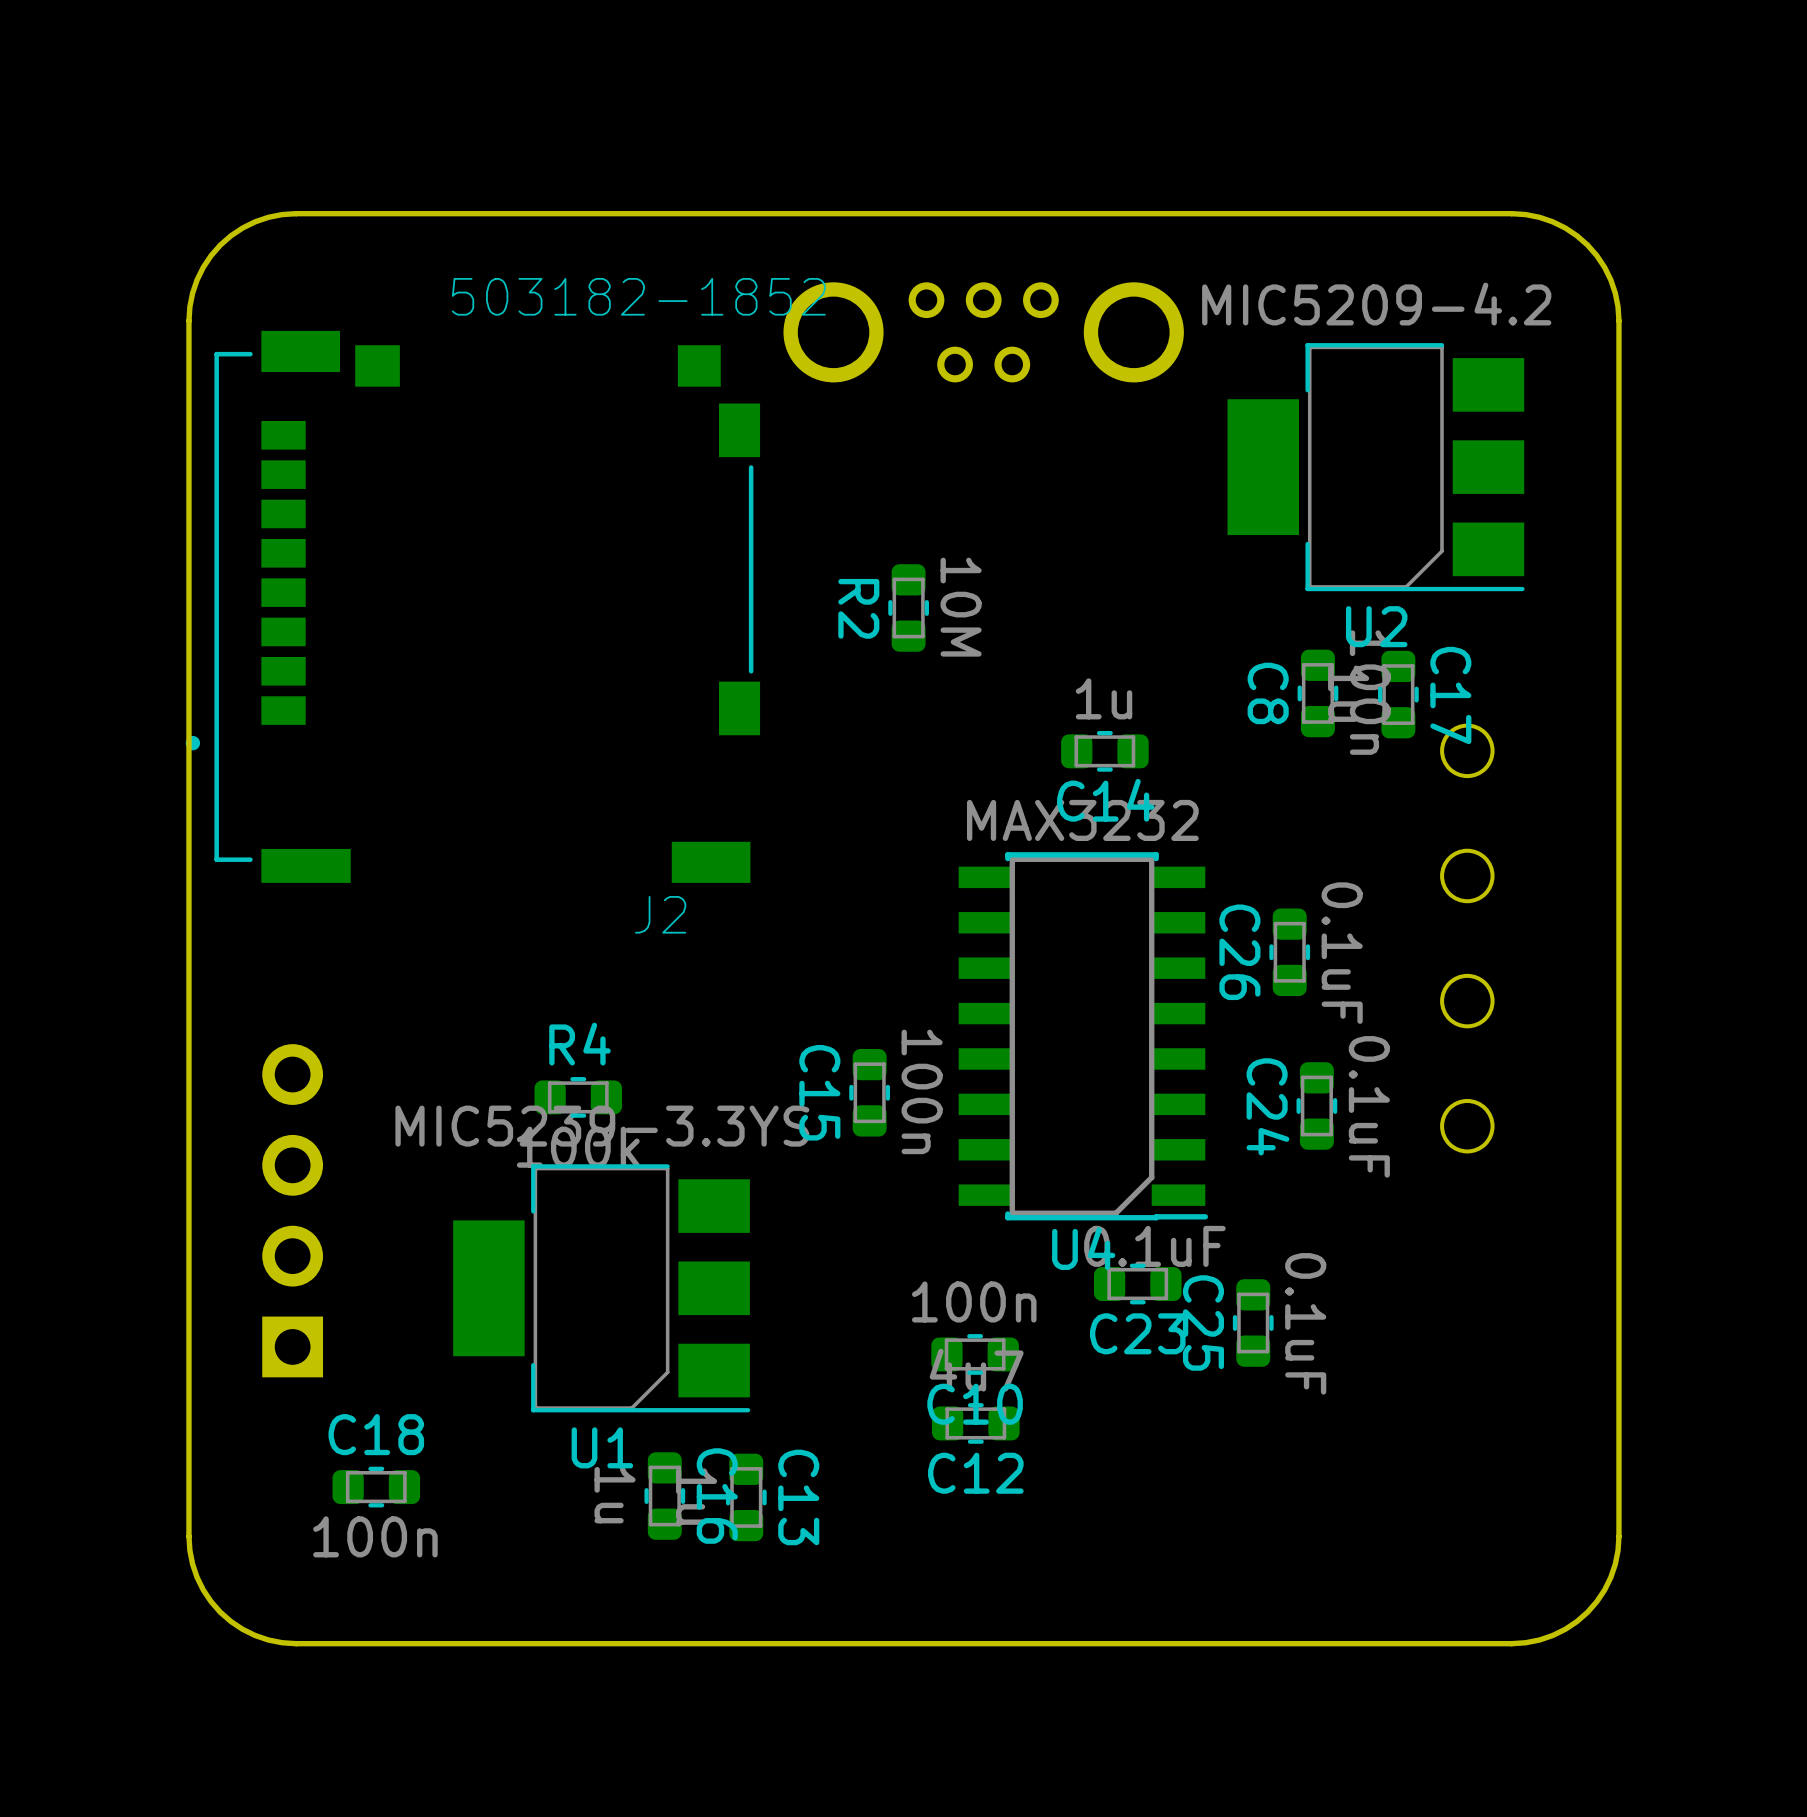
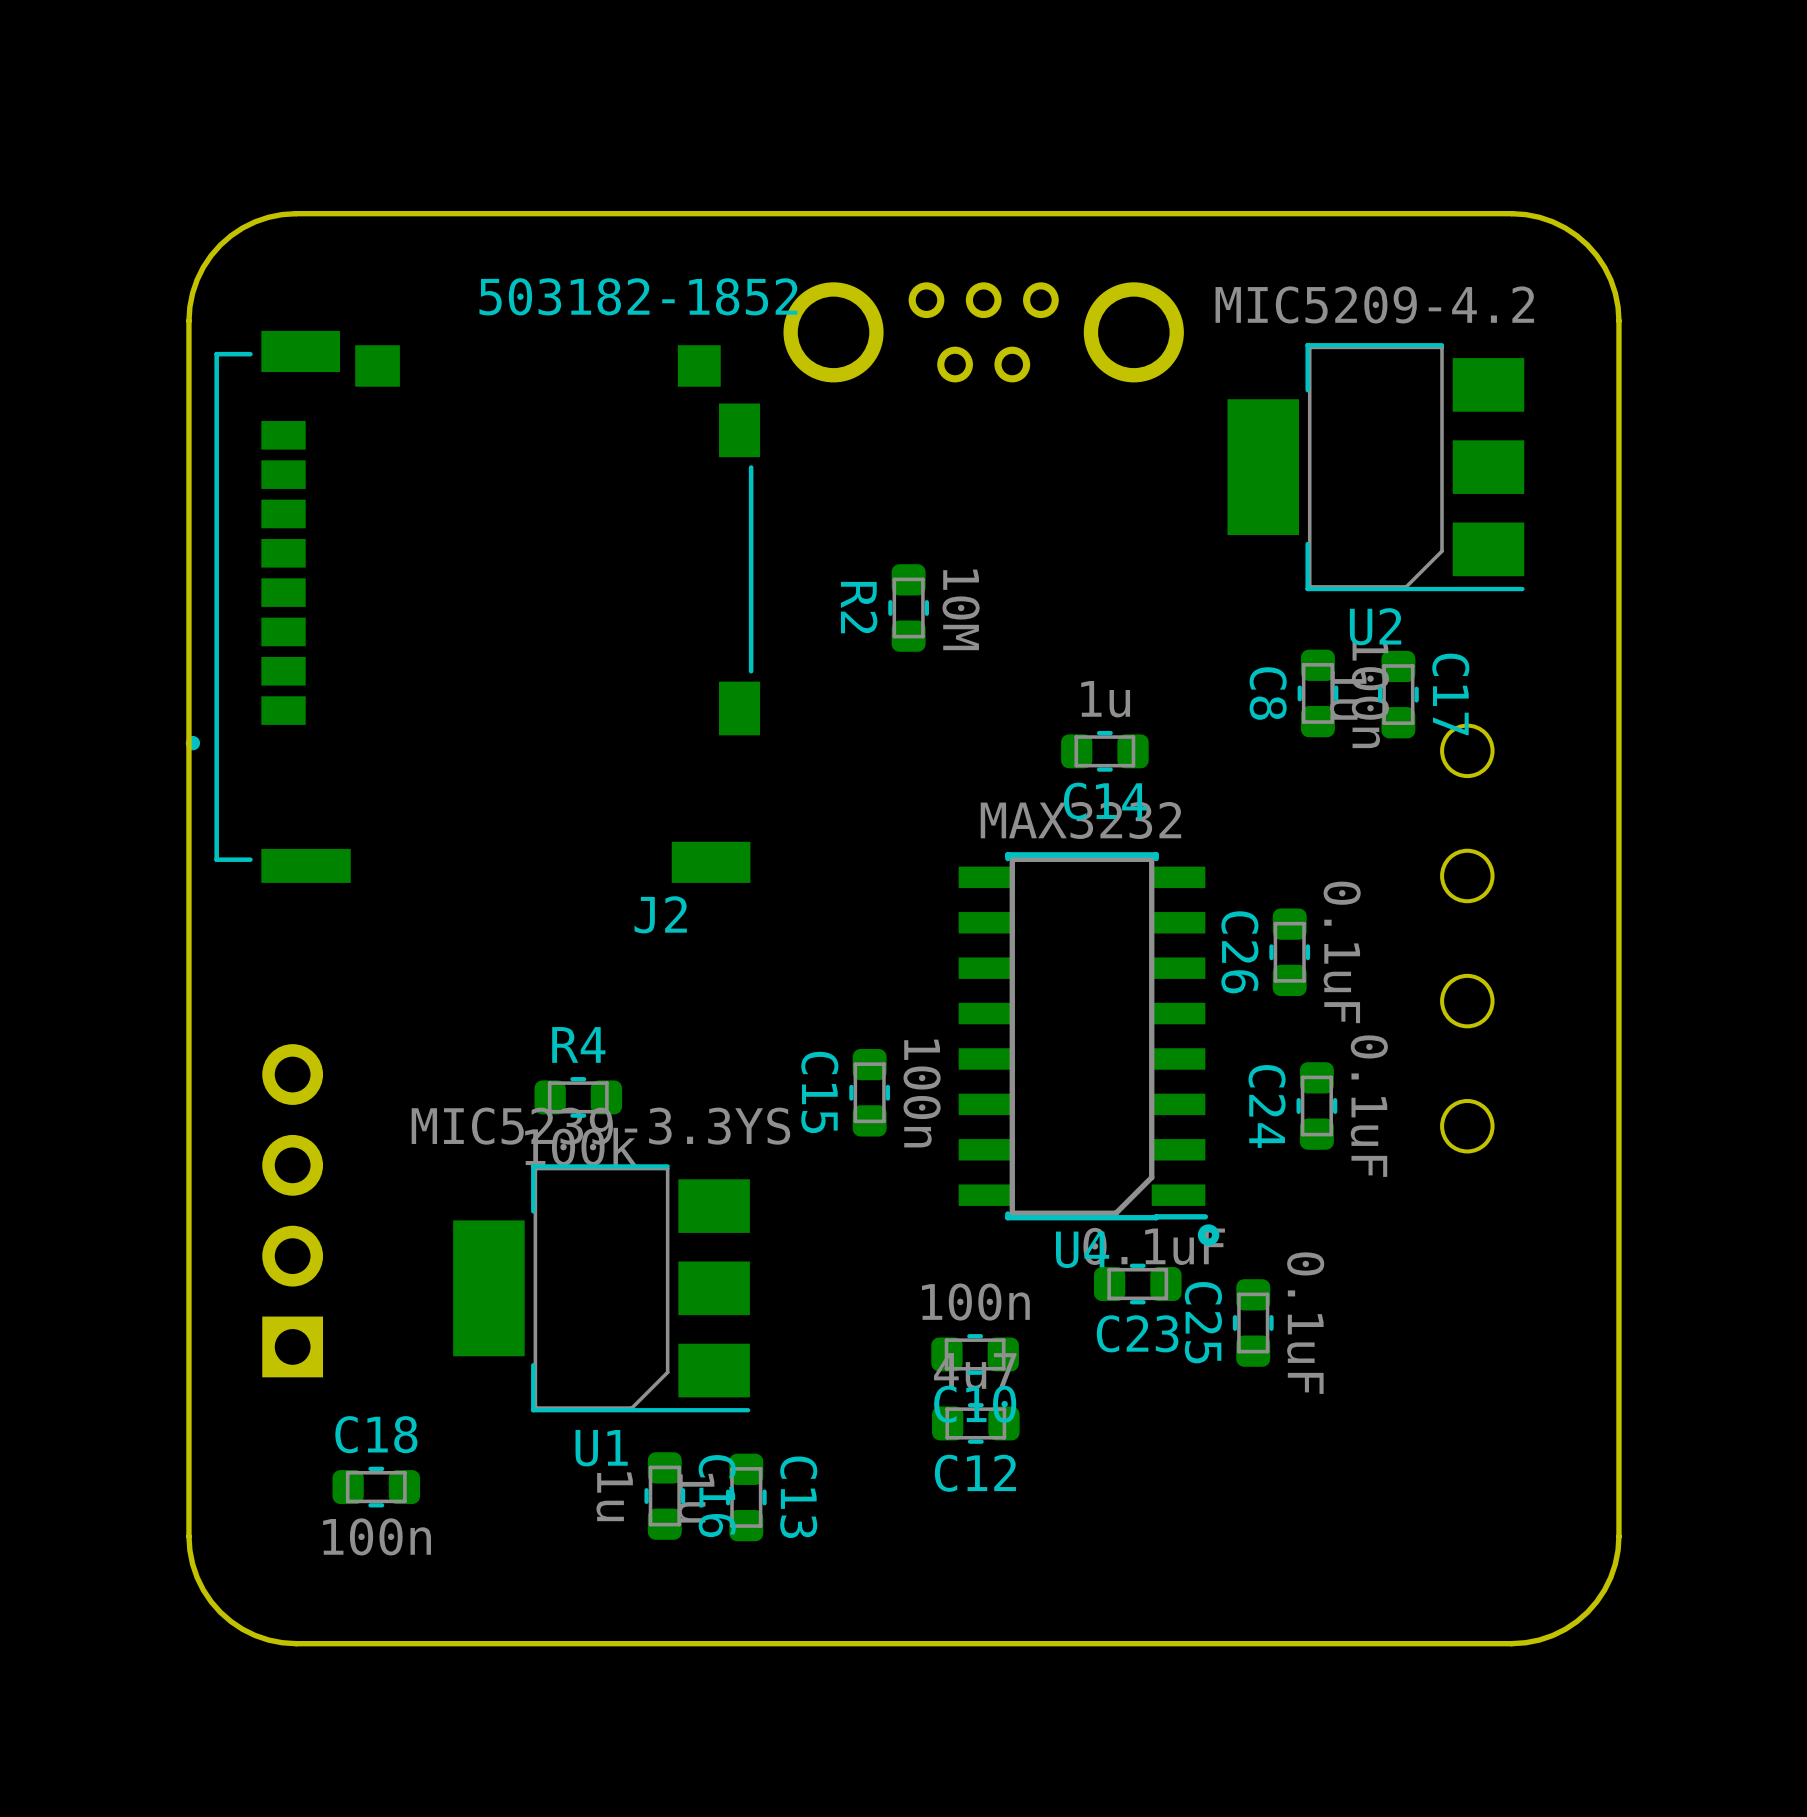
drawing: none -> [1197, 1224, 1220, 1246]

